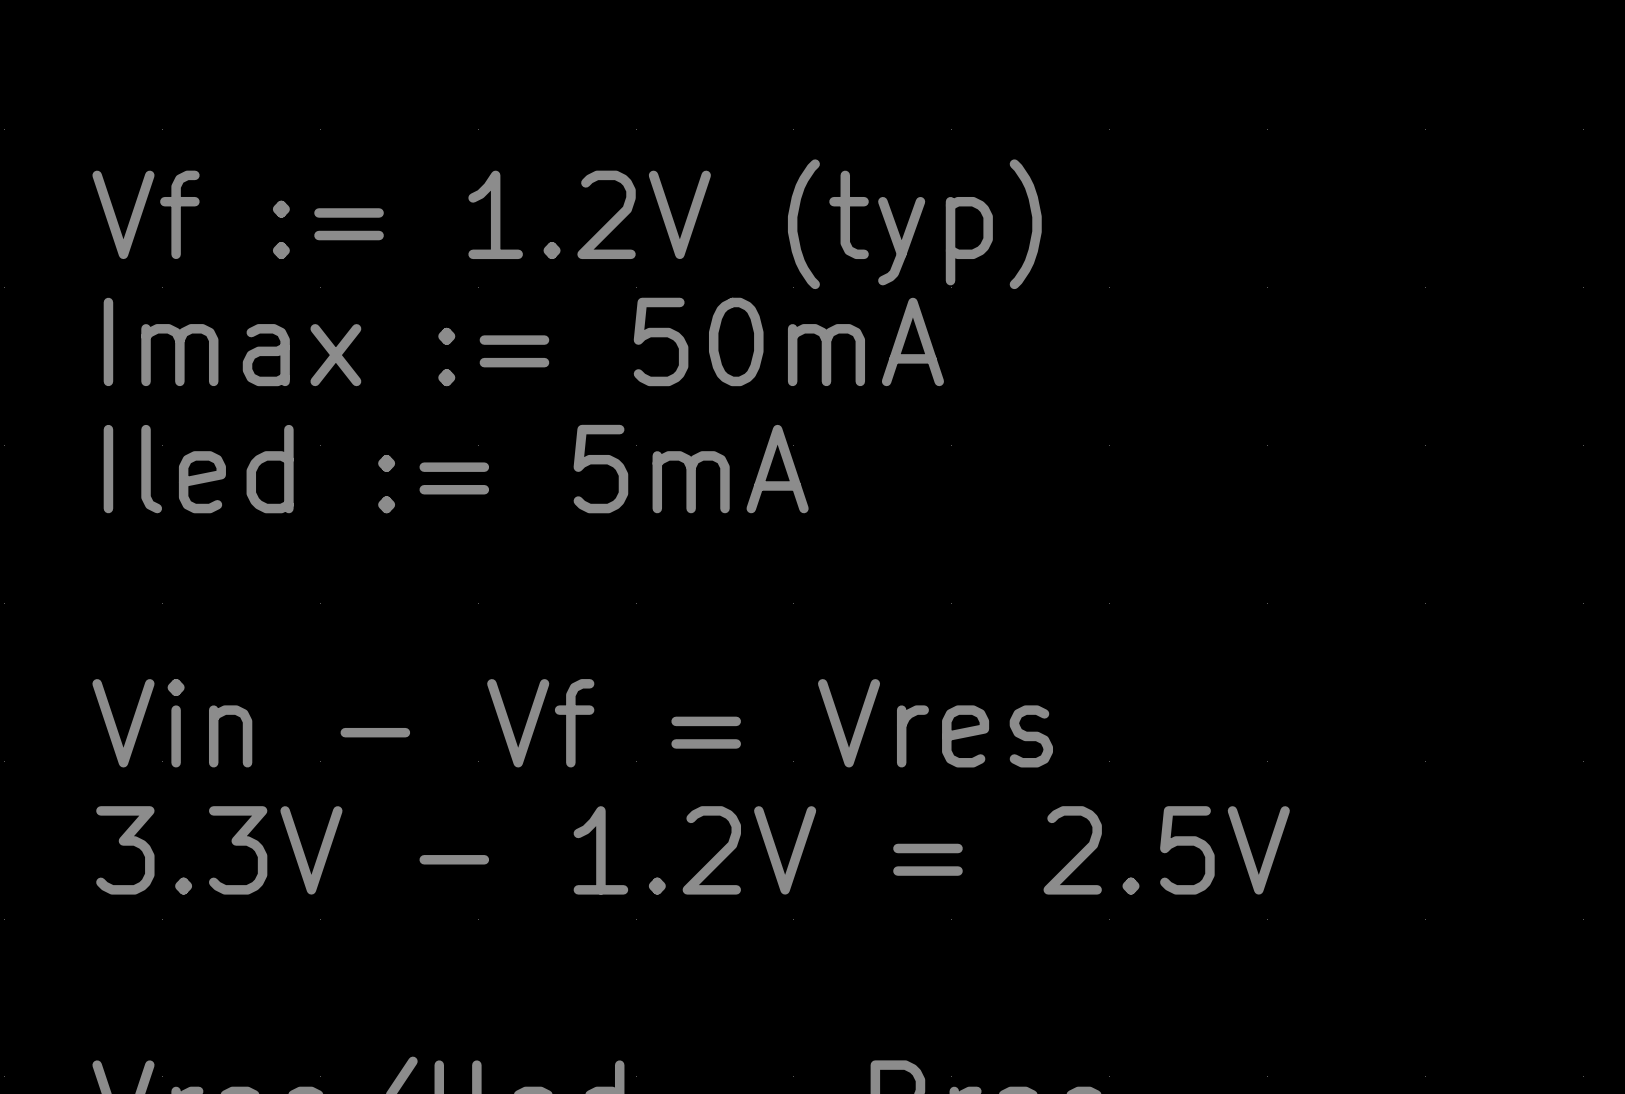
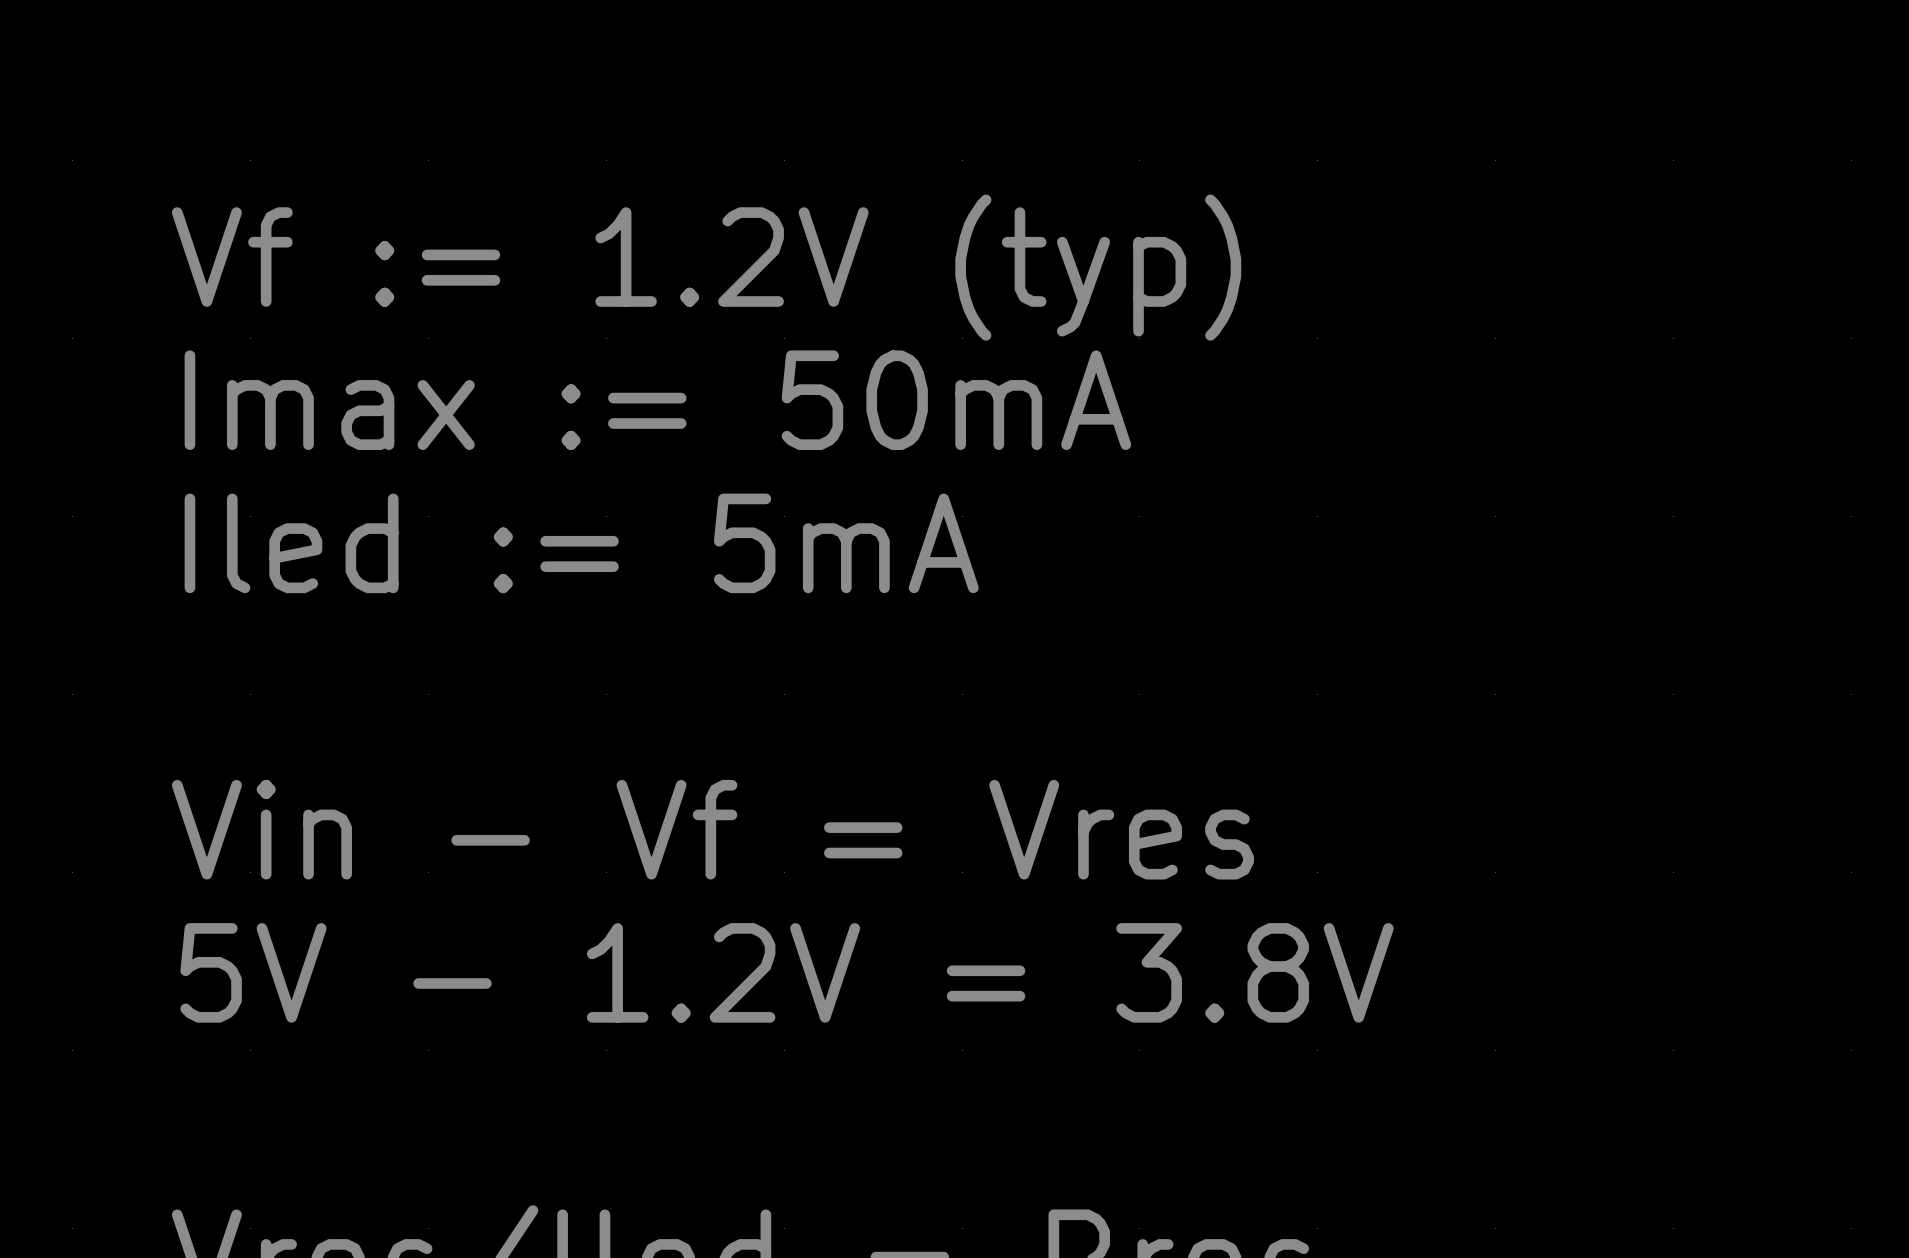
text: 3.3V - 1.2V = 2.5V (693, 850) -> 5V - 1.2V = 3.8V (787, 972)

